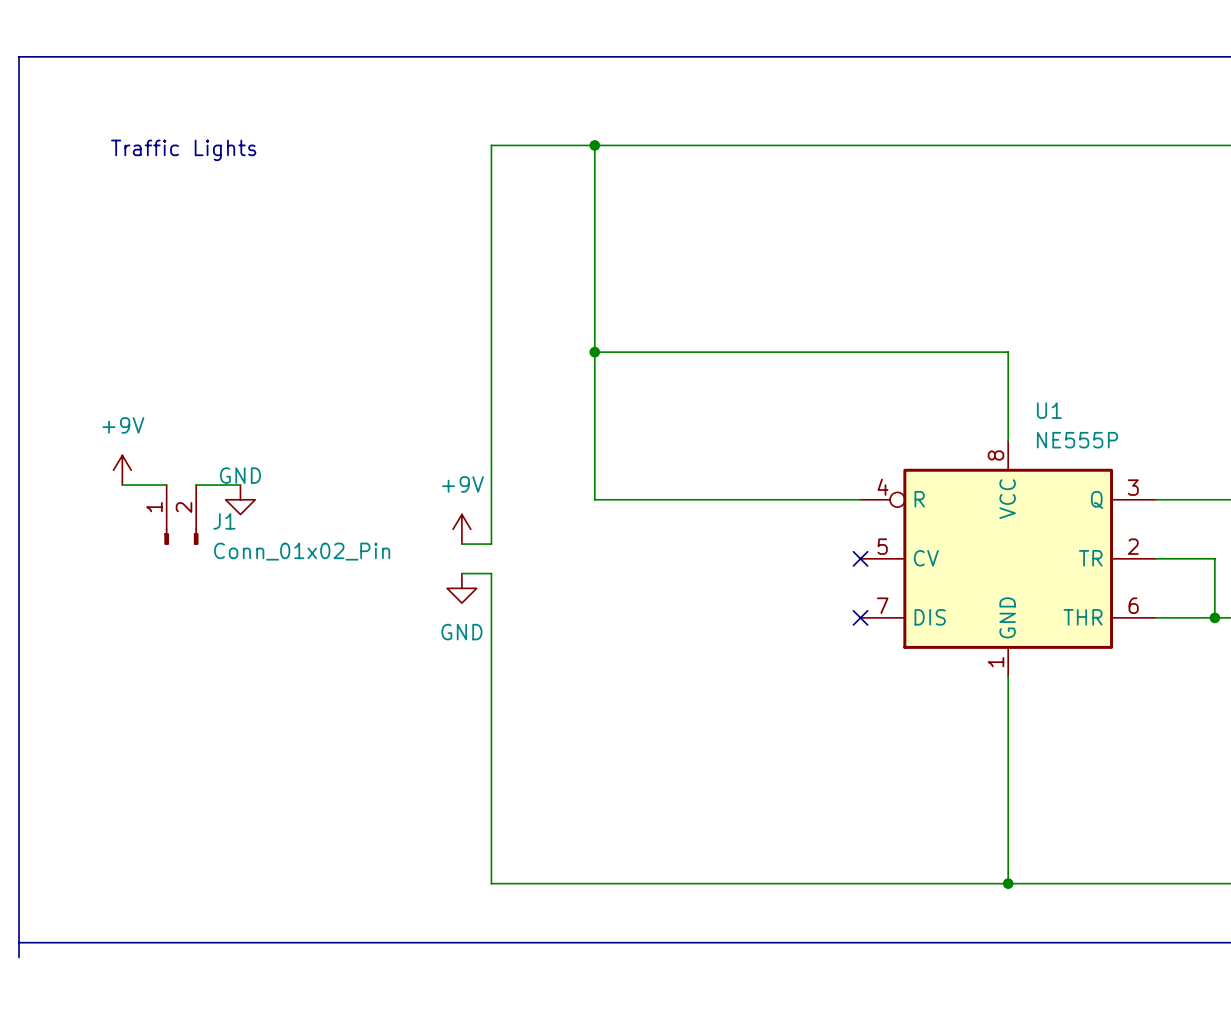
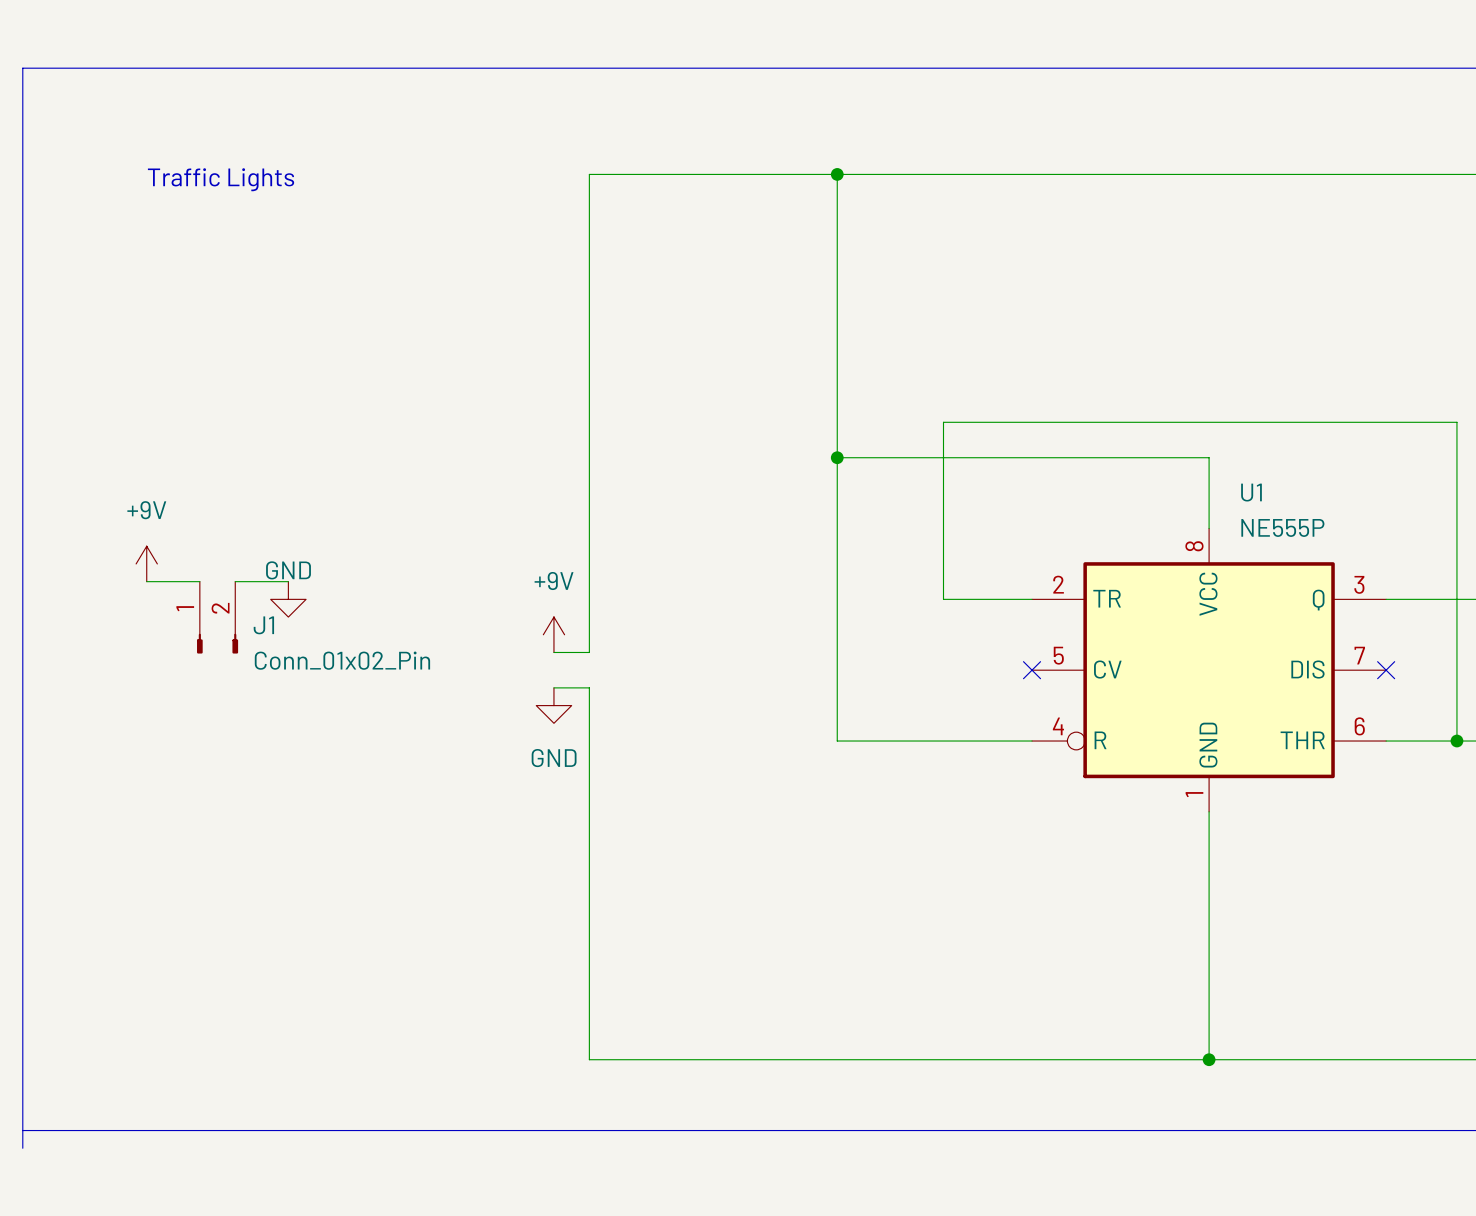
wire: (594, 145) (594, 499) (786, 499) -> none
junction: (594, 145) -> none
wire: none -> (837, 174) (837, 741) (1032, 741)
junction: none -> (837, 174)
wire: (594, 352) (786, 352) -> (943, 599) (943, 422)
junction: (594, 352) -> none
wire: (1008, 352) (1008, 381) -> (837, 457) (1209, 457)
junction: none -> (837, 457)
U1 symbol: [860, 440, 1156, 677] -> [1032, 528, 1387, 812]
wire: (1155, 558) (1214, 558) -> (1209, 422) (1456, 422) (1456, 670)
no-connect mark: none -> (1386, 670)
no-connect mark: (860, 617) -> none

